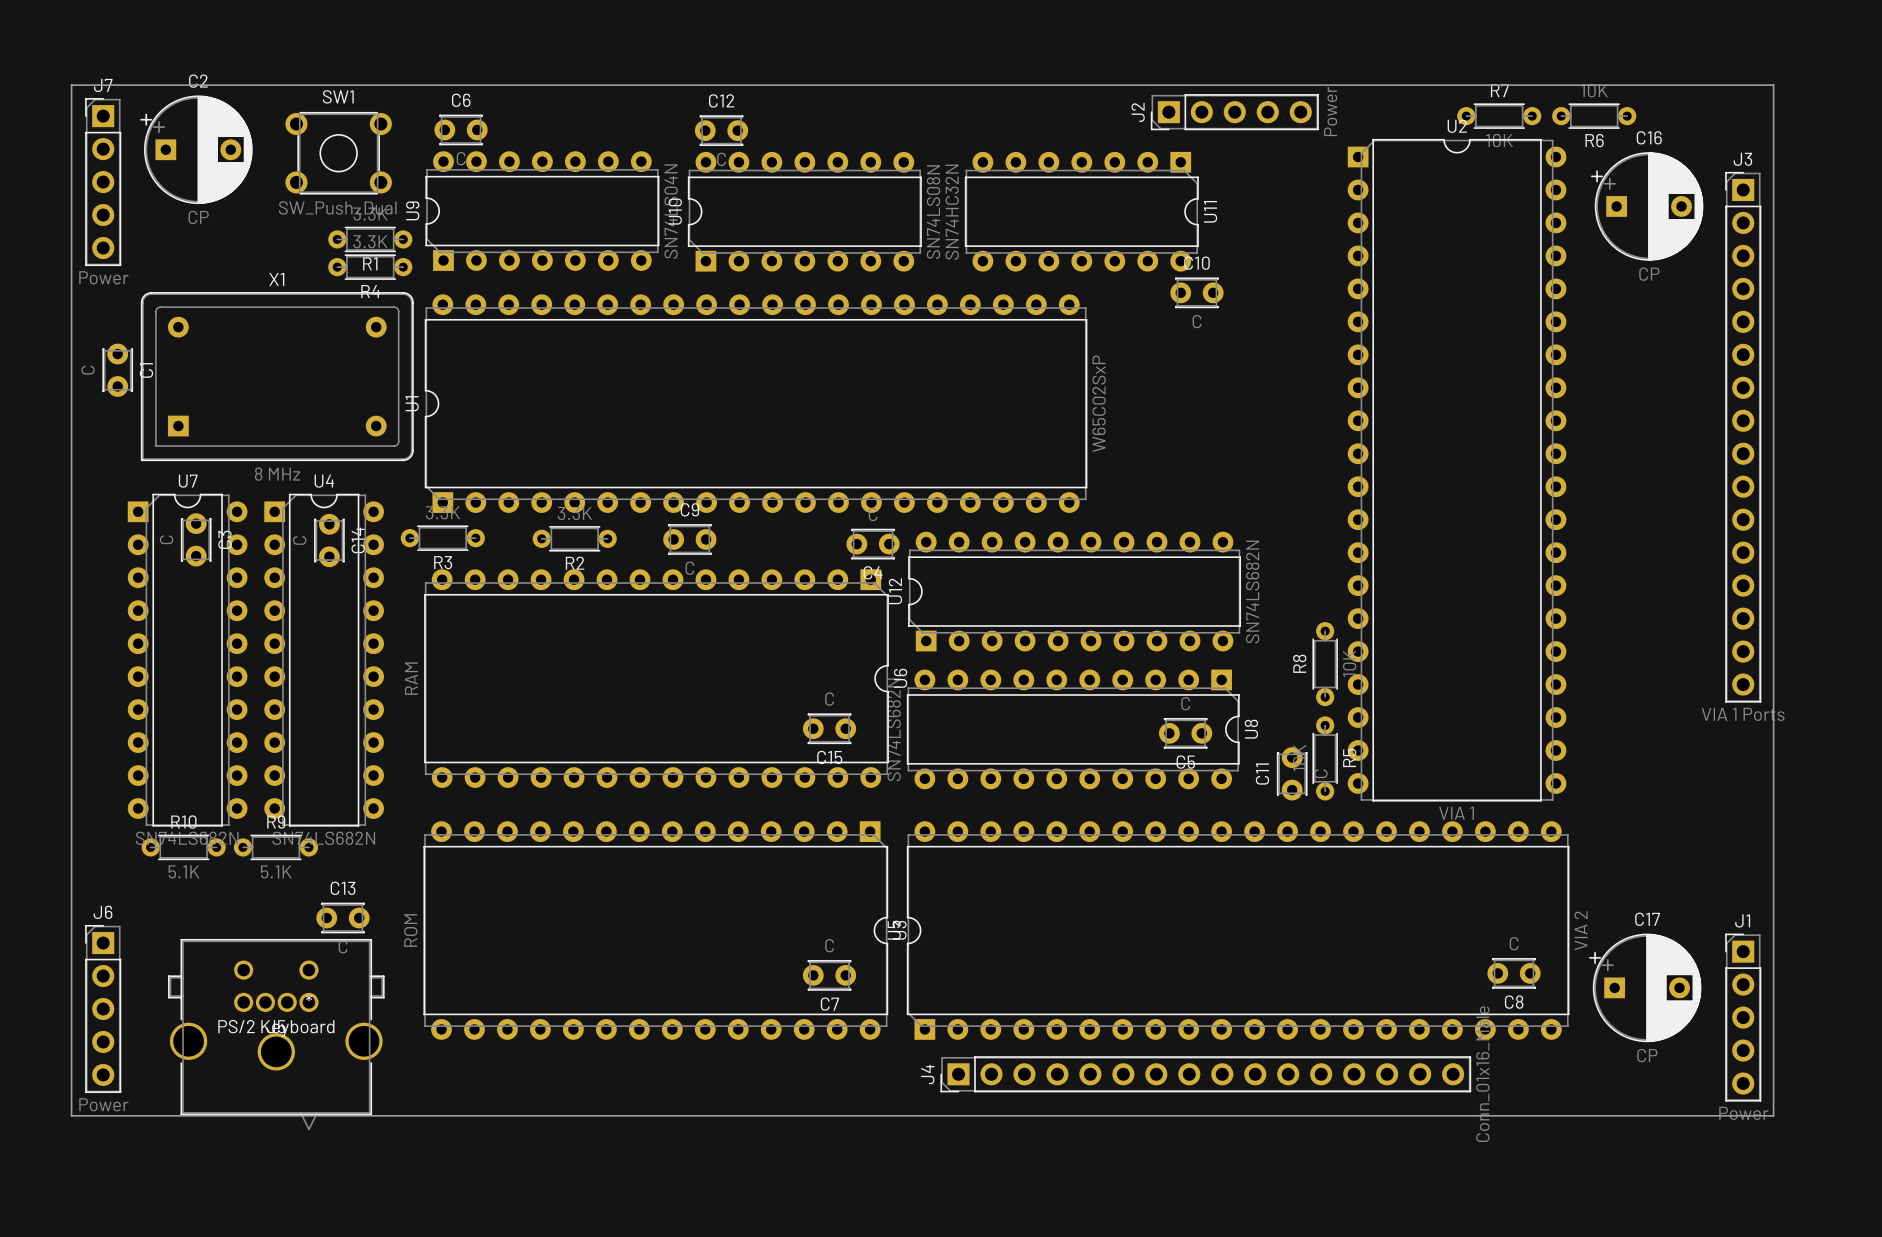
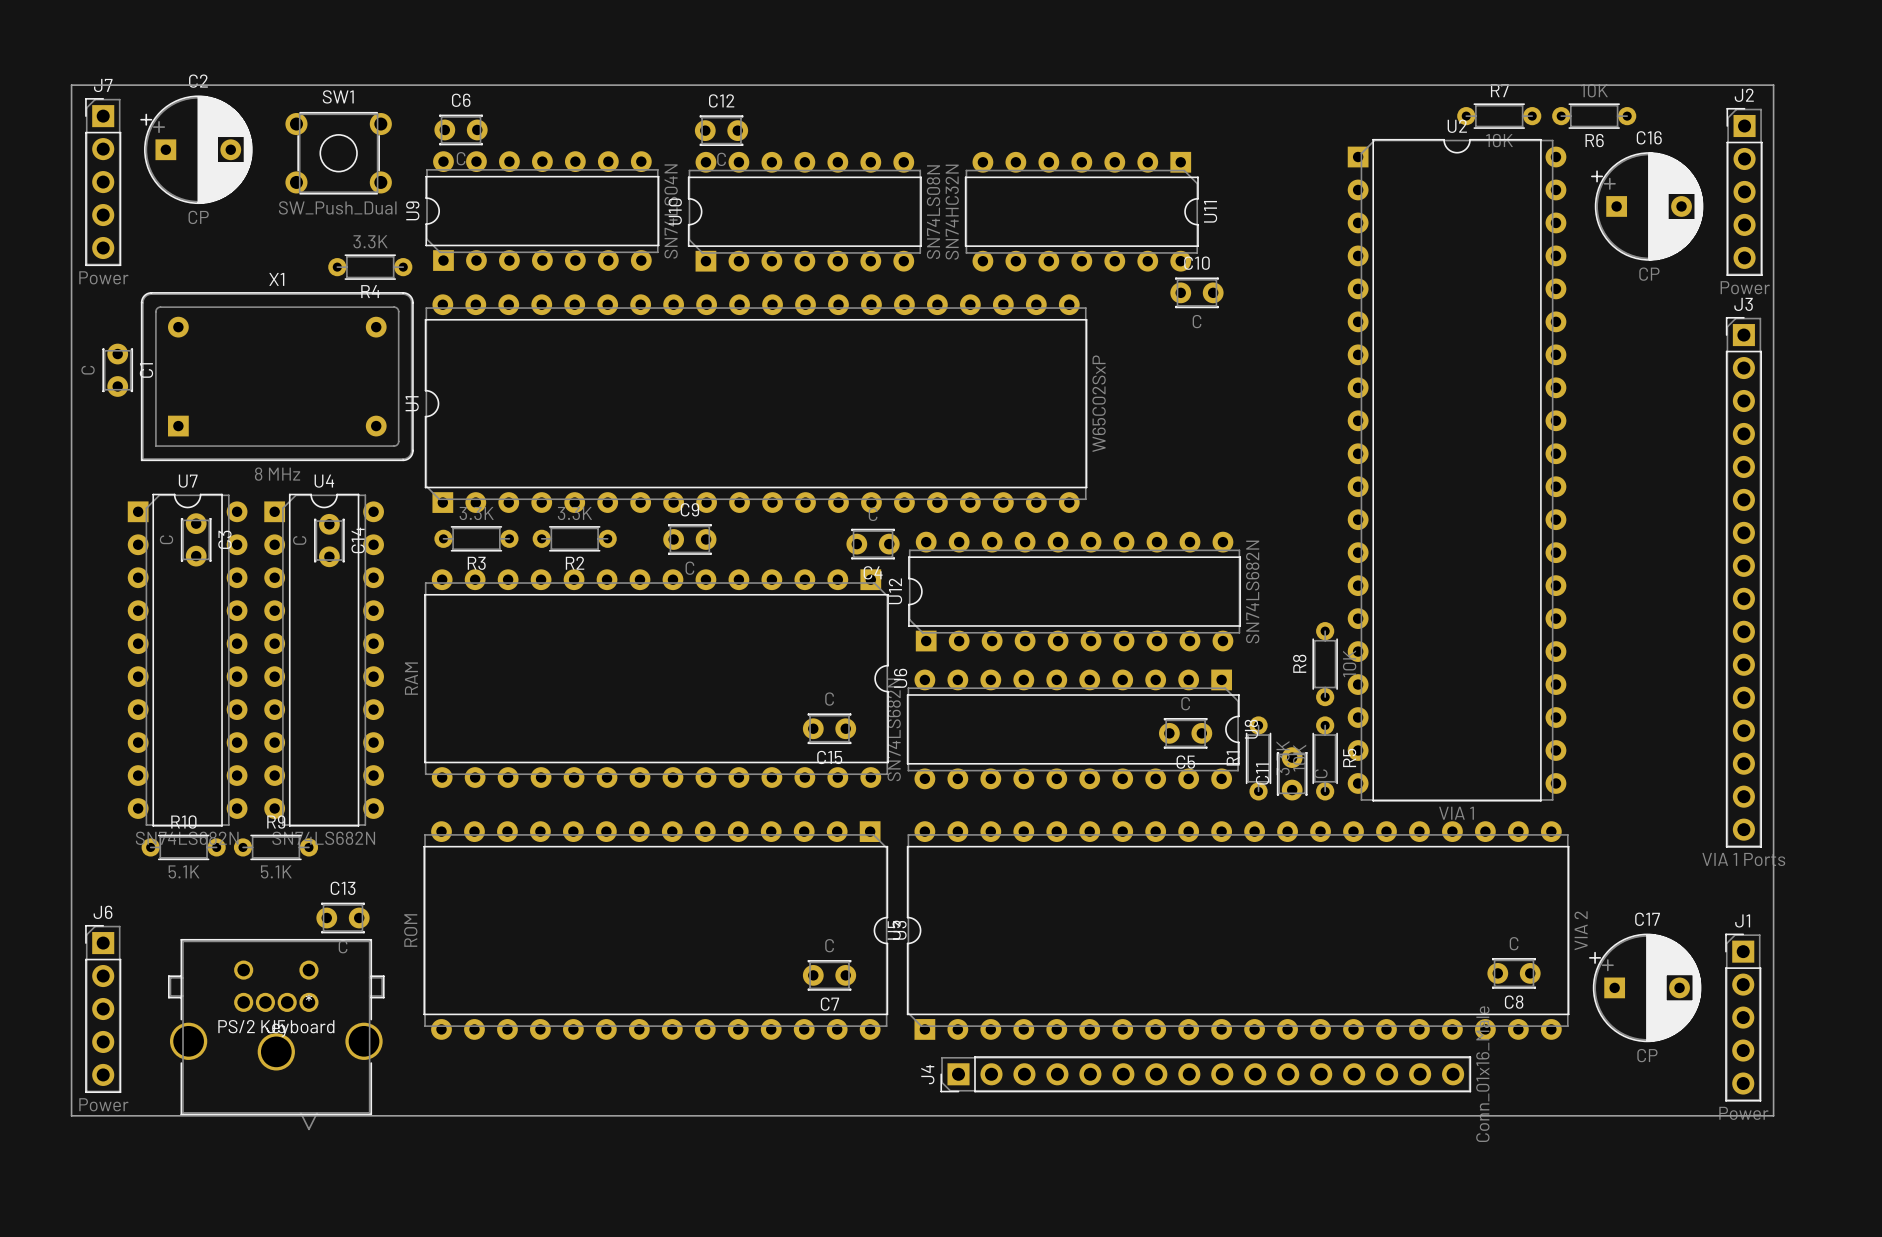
J2 rotation: 0° (1234, 112) -> 90° clockwise (1744, 191)
J2 position: (1234, 112) -> (1744, 191)
R1 rotation: 0° (370, 239) -> 90° clockwise (1258, 758)
R1 position: (370, 239) -> (1258, 758)
J3 position: (1743, 437) -> (1743, 582)
R3 position: (442, 538) -> (476, 538)

